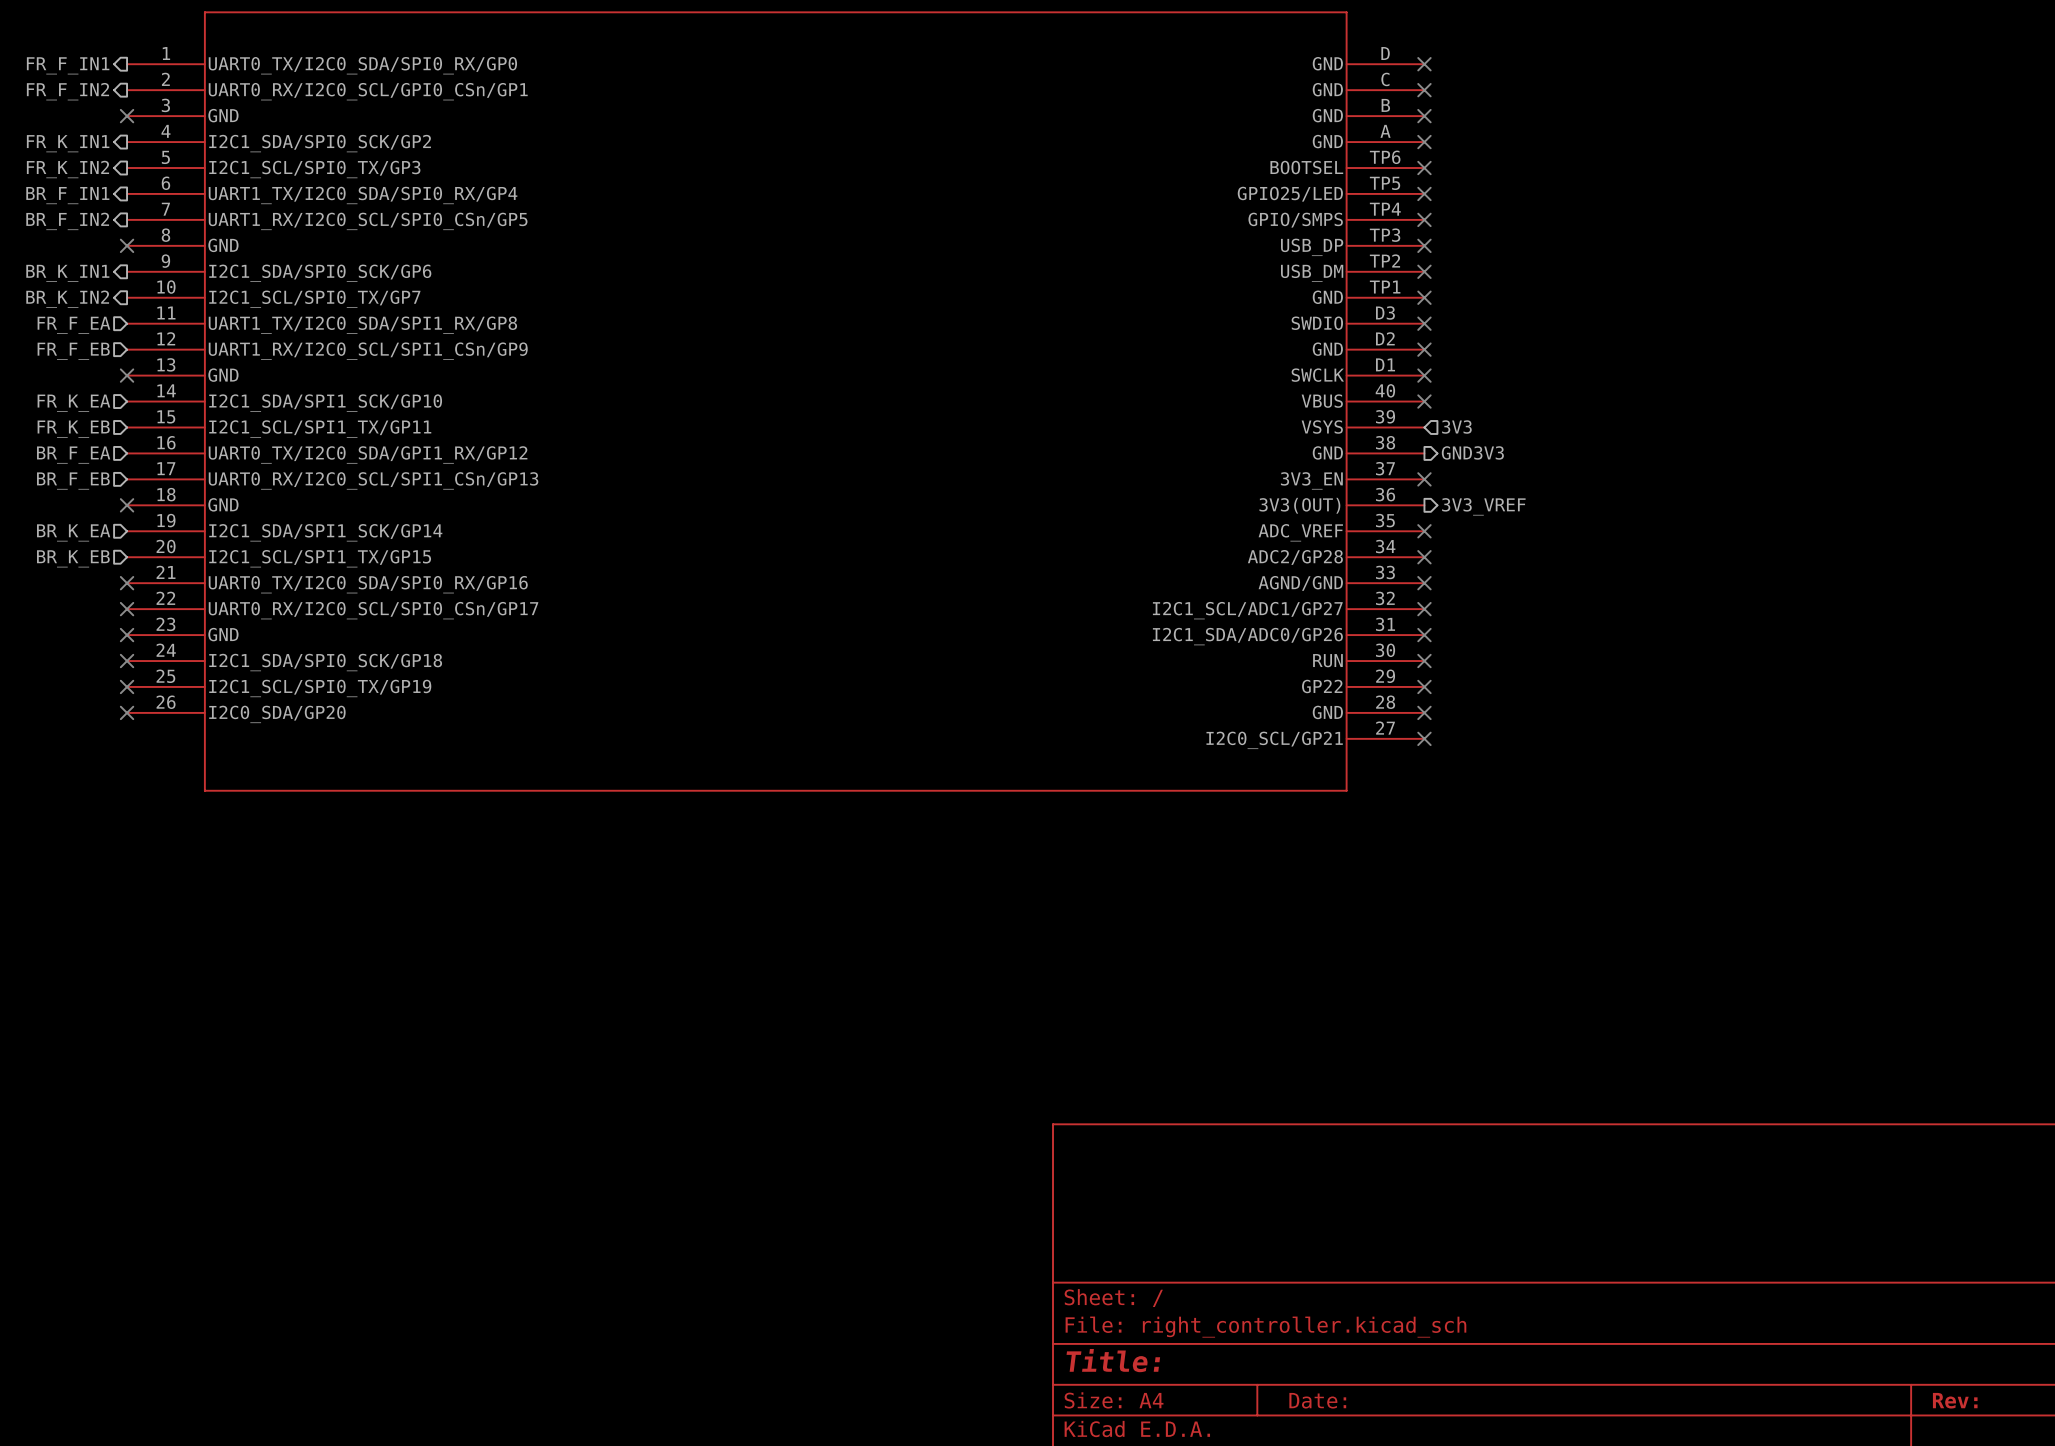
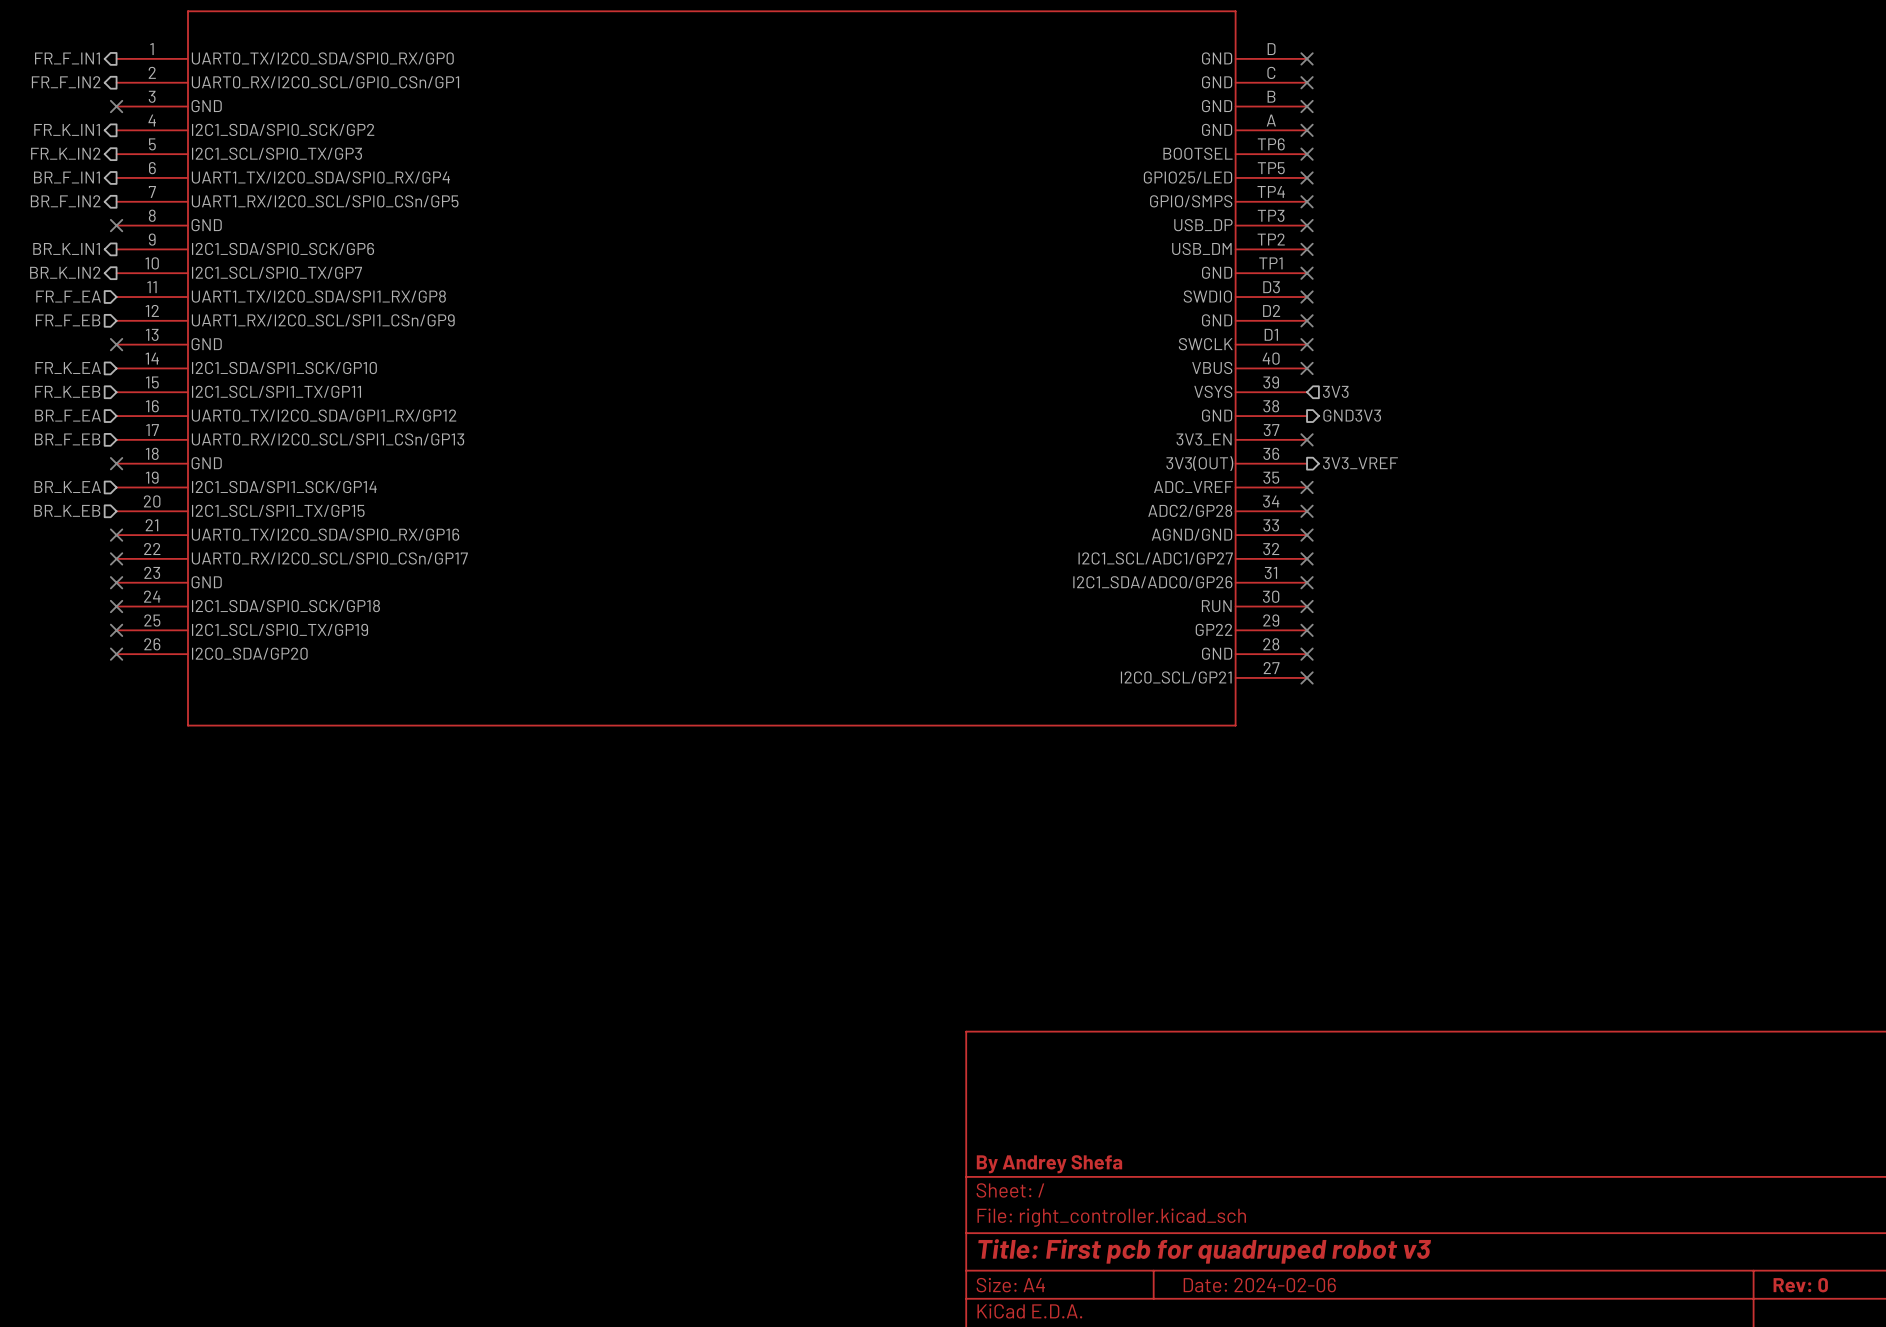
title block: none -> By Andrey Shefa (1049, 1164)
title block: Title: (1113, 1360) -> Title: First pcb for quadruped robot v3 (1204, 1251)
title block: Date: (1317, 1400) -> Date: 2024-02-06 (1259, 1285)
title block: Rev: (1955, 1400) -> Rev: 0 (1800, 1285)

